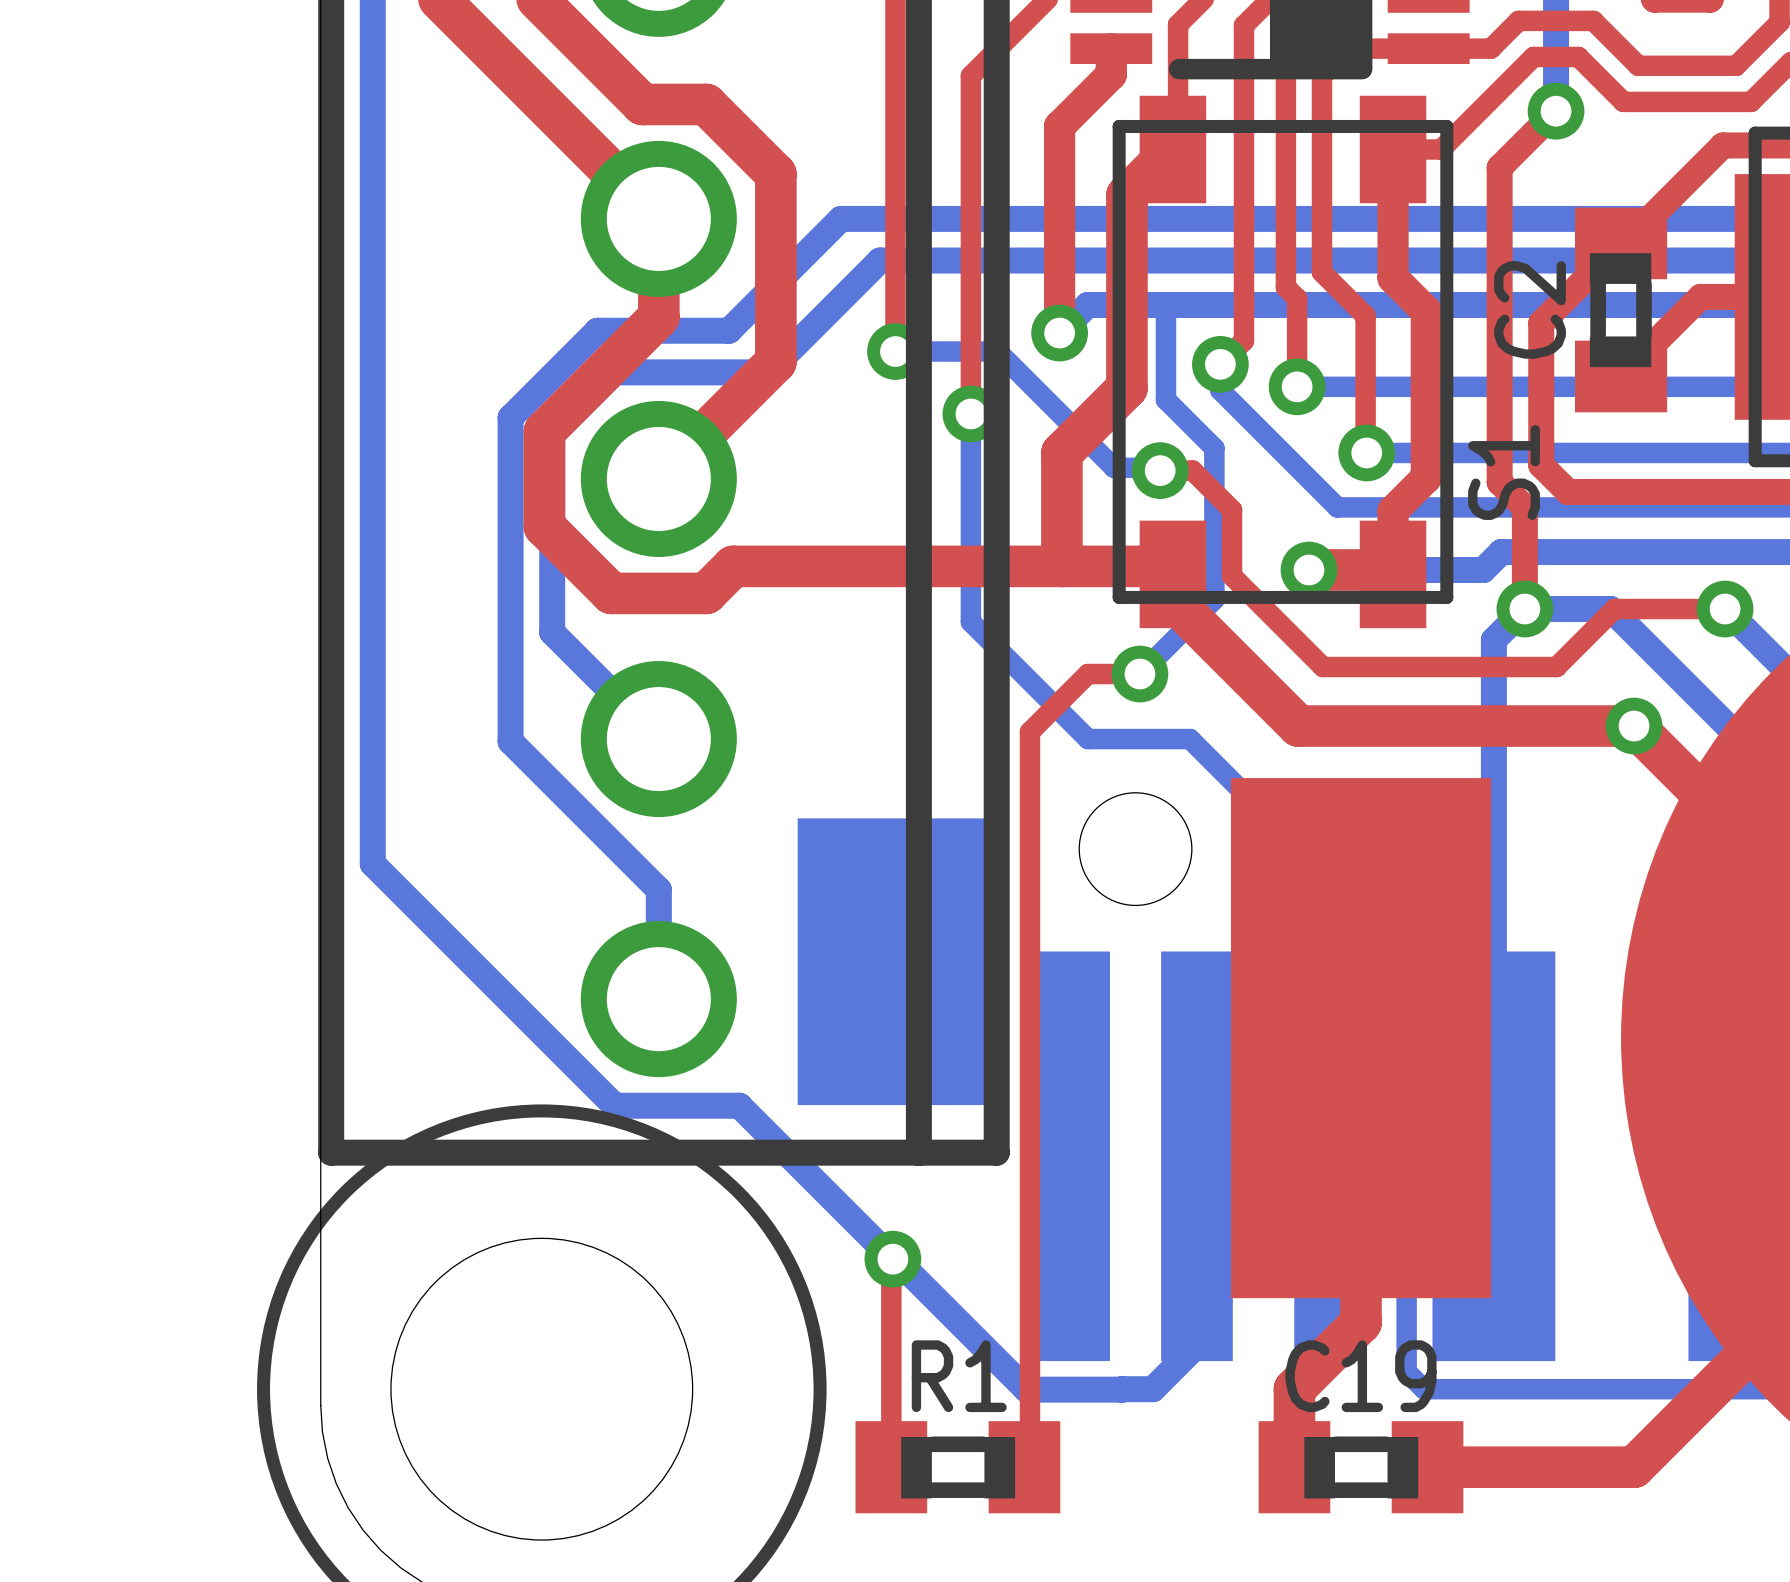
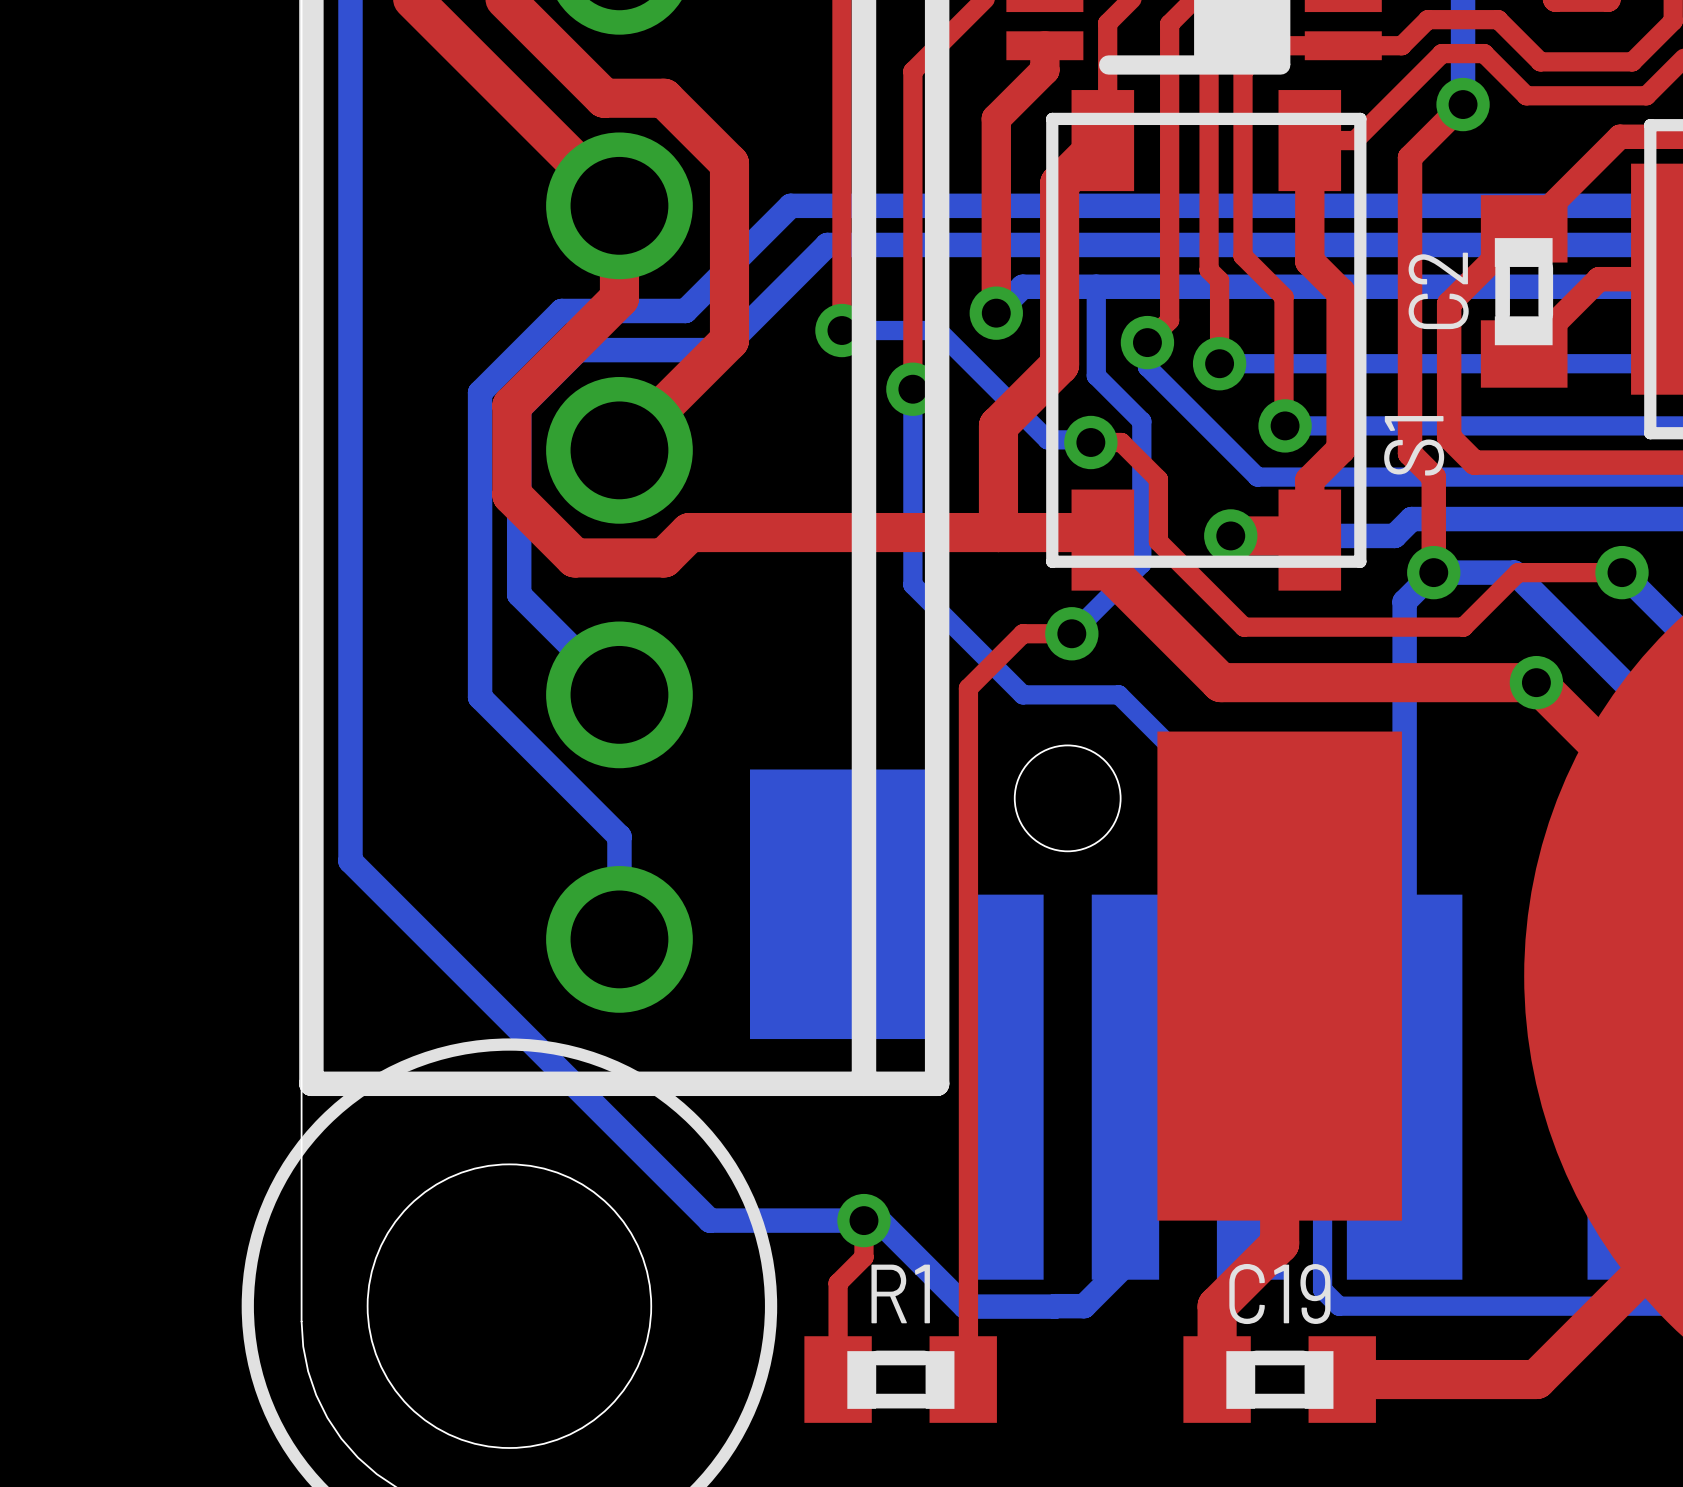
bottom track: (372, 863) (614, 1105) (739, 1105) (892, 1259) (895, 1259) (934, 1298) -> (350, 812) (350, 861) (709, 1220) (879, 1220)
top track: (892, 1259) (891, 1260) (891, 1364) -> (863, 1220) (863, 1257) (838, 1283)
via position: (892, 1259) -> (863, 1220)

